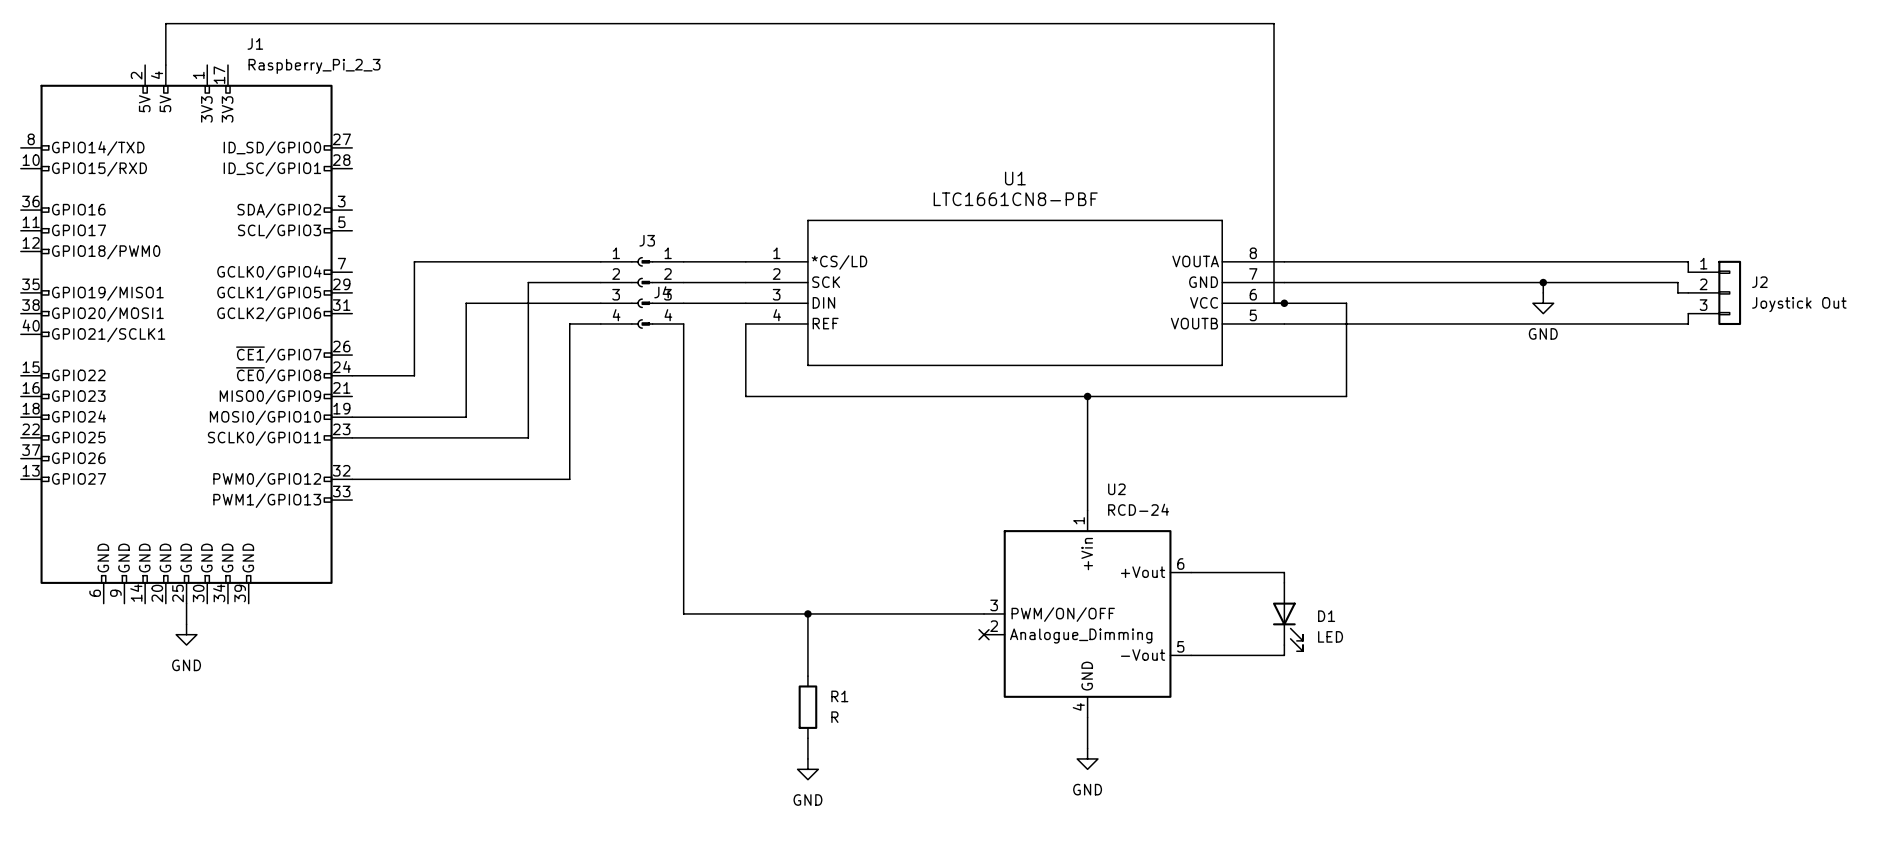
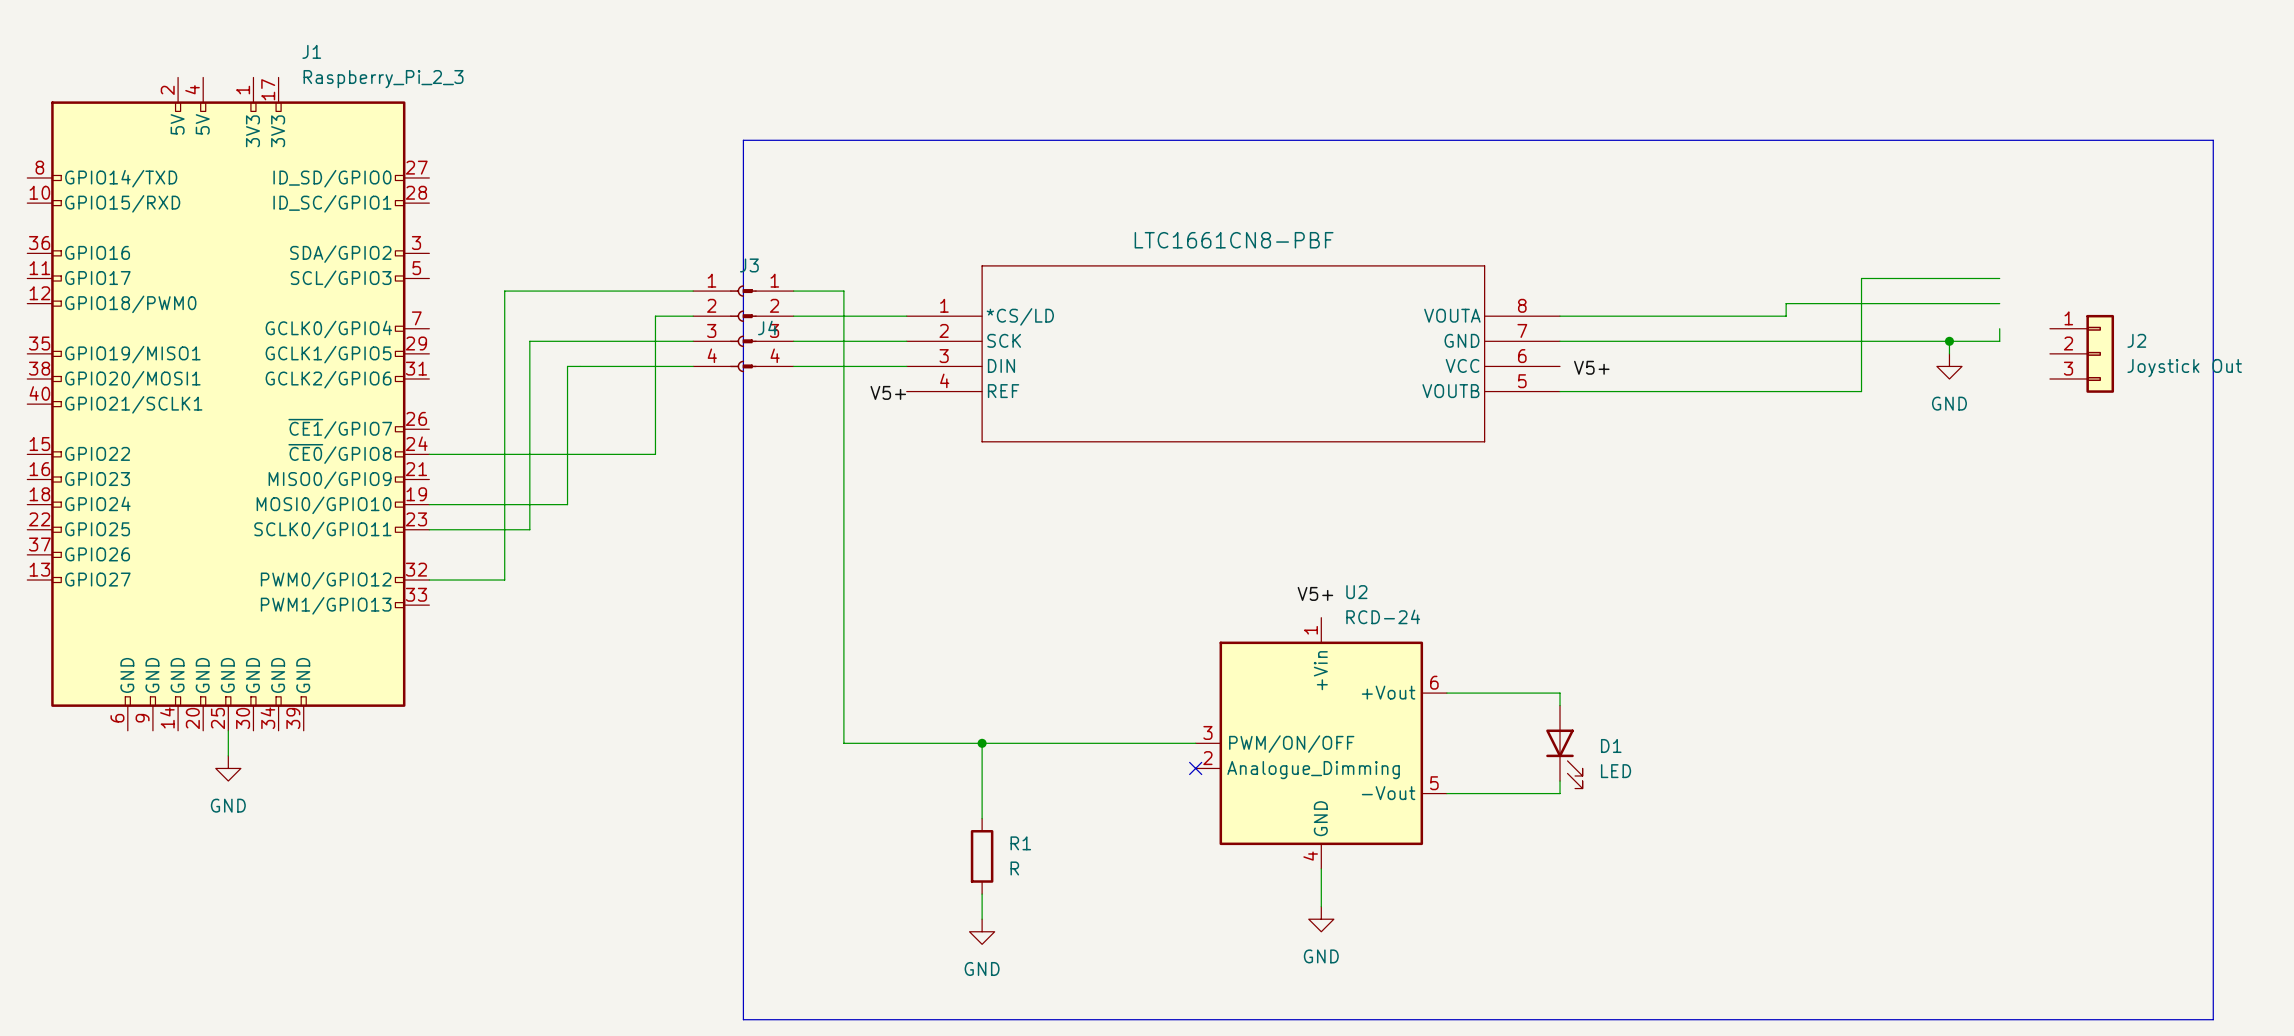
wire: (165, 65) (165, 23) (1274, 23) (1274, 303) (1346, 303) (1346, 396) (745, 396) (745, 323) -> none
line: none -> (743, 140) (2213, 140) (2213, 1019) (743, 1019) (743, 140)
U1 name: U1 (1015, 178) -> none
wire: (414, 261) (538, 261) -> (504, 316) (504, 291) (693, 291)
wire: (1470, 261) (1688, 261) (1688, 272) -> (1786, 316) (1786, 303) (1999, 303)
wire: (528, 282) (528, 437) (435, 437) -> (642, 341) (529, 341) (529, 529)
wire: (1543, 282) (1543, 292) -> (1949, 341) (1949, 353)
junction: (1543, 282) -> none
junction: none -> (1949, 341)
wire: (1646, 282) (1677, 282) (1677, 292) (1688, 292) -> (1999, 341) (1999, 328)
J4 position: (621, 292) -> (718, 328)
J3 position: (662, 292) -> (768, 328)
junction: (1284, 303) -> none
power symbol position: GND (1543, 303) -> GND (1949, 366)
label: none -> V5+ (1591, 367)
wire: (1688, 313) (1688, 323) (1532, 323) -> (1999, 278) (1861, 278) (1861, 391)
wire: (600, 323) (569, 323) (569, 479) (414, 479) -> (655, 316) (655, 454) (504, 454) (504, 580)
wire: (683, 323) (683, 613) (694, 613) -> (793, 291) (843, 291) (843, 743)
label: none -> V5+ (888, 392)
wire: (1087, 396) (1087, 510) -> none
junction: (1087, 396) -> none
label: none -> V5+ (1315, 593)

